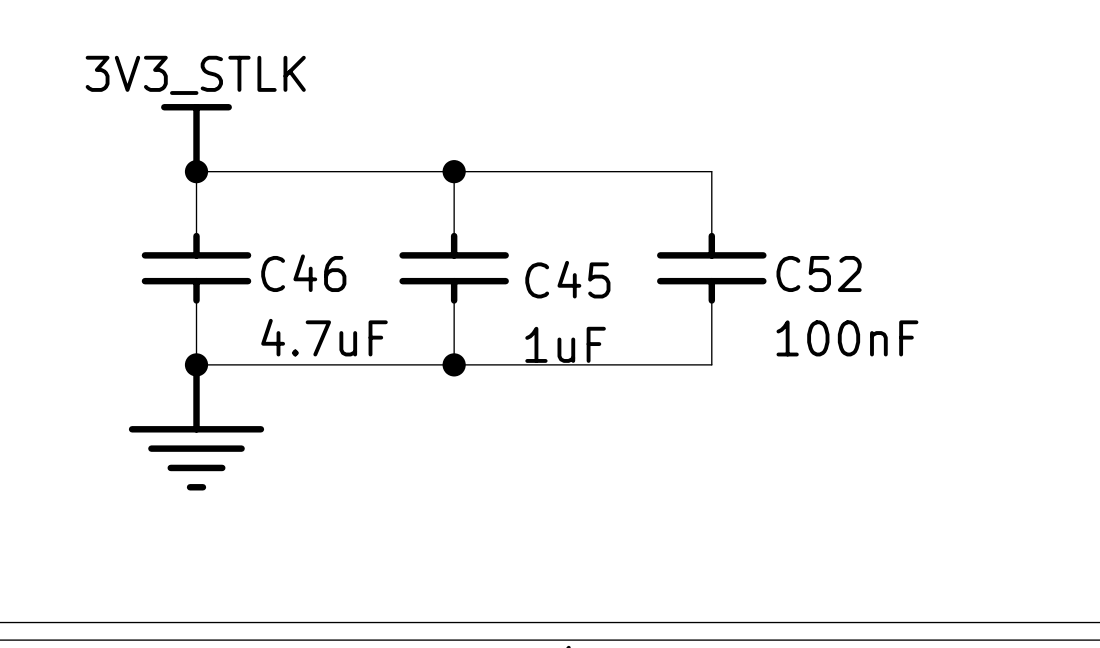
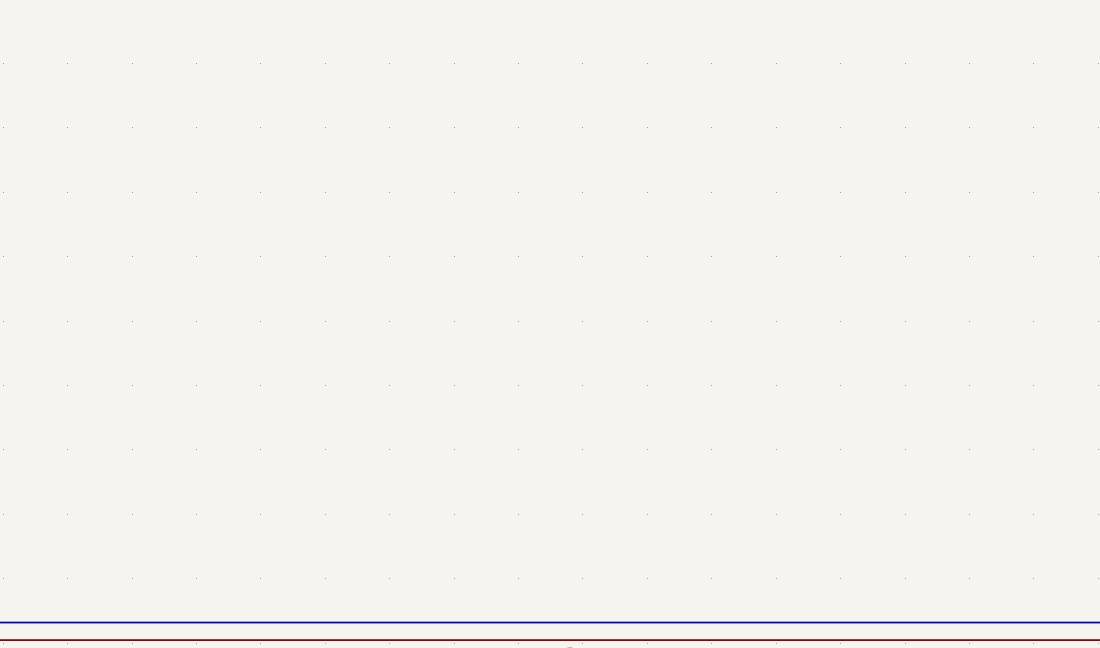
power symbol: 3V3_STLK (196, 139) -> none
wire: (196, 171) (711, 171) -> none
junction: (196, 171) -> none
junction: (454, 171) -> none
C46: (196, 268) -> none
C45: (454, 268) -> none
C52: (711, 268) -> none
wire: (196, 364) (711, 364) -> none
junction: (196, 364) -> none
junction: (454, 364) -> none
power symbol: (196, 426) -> none

